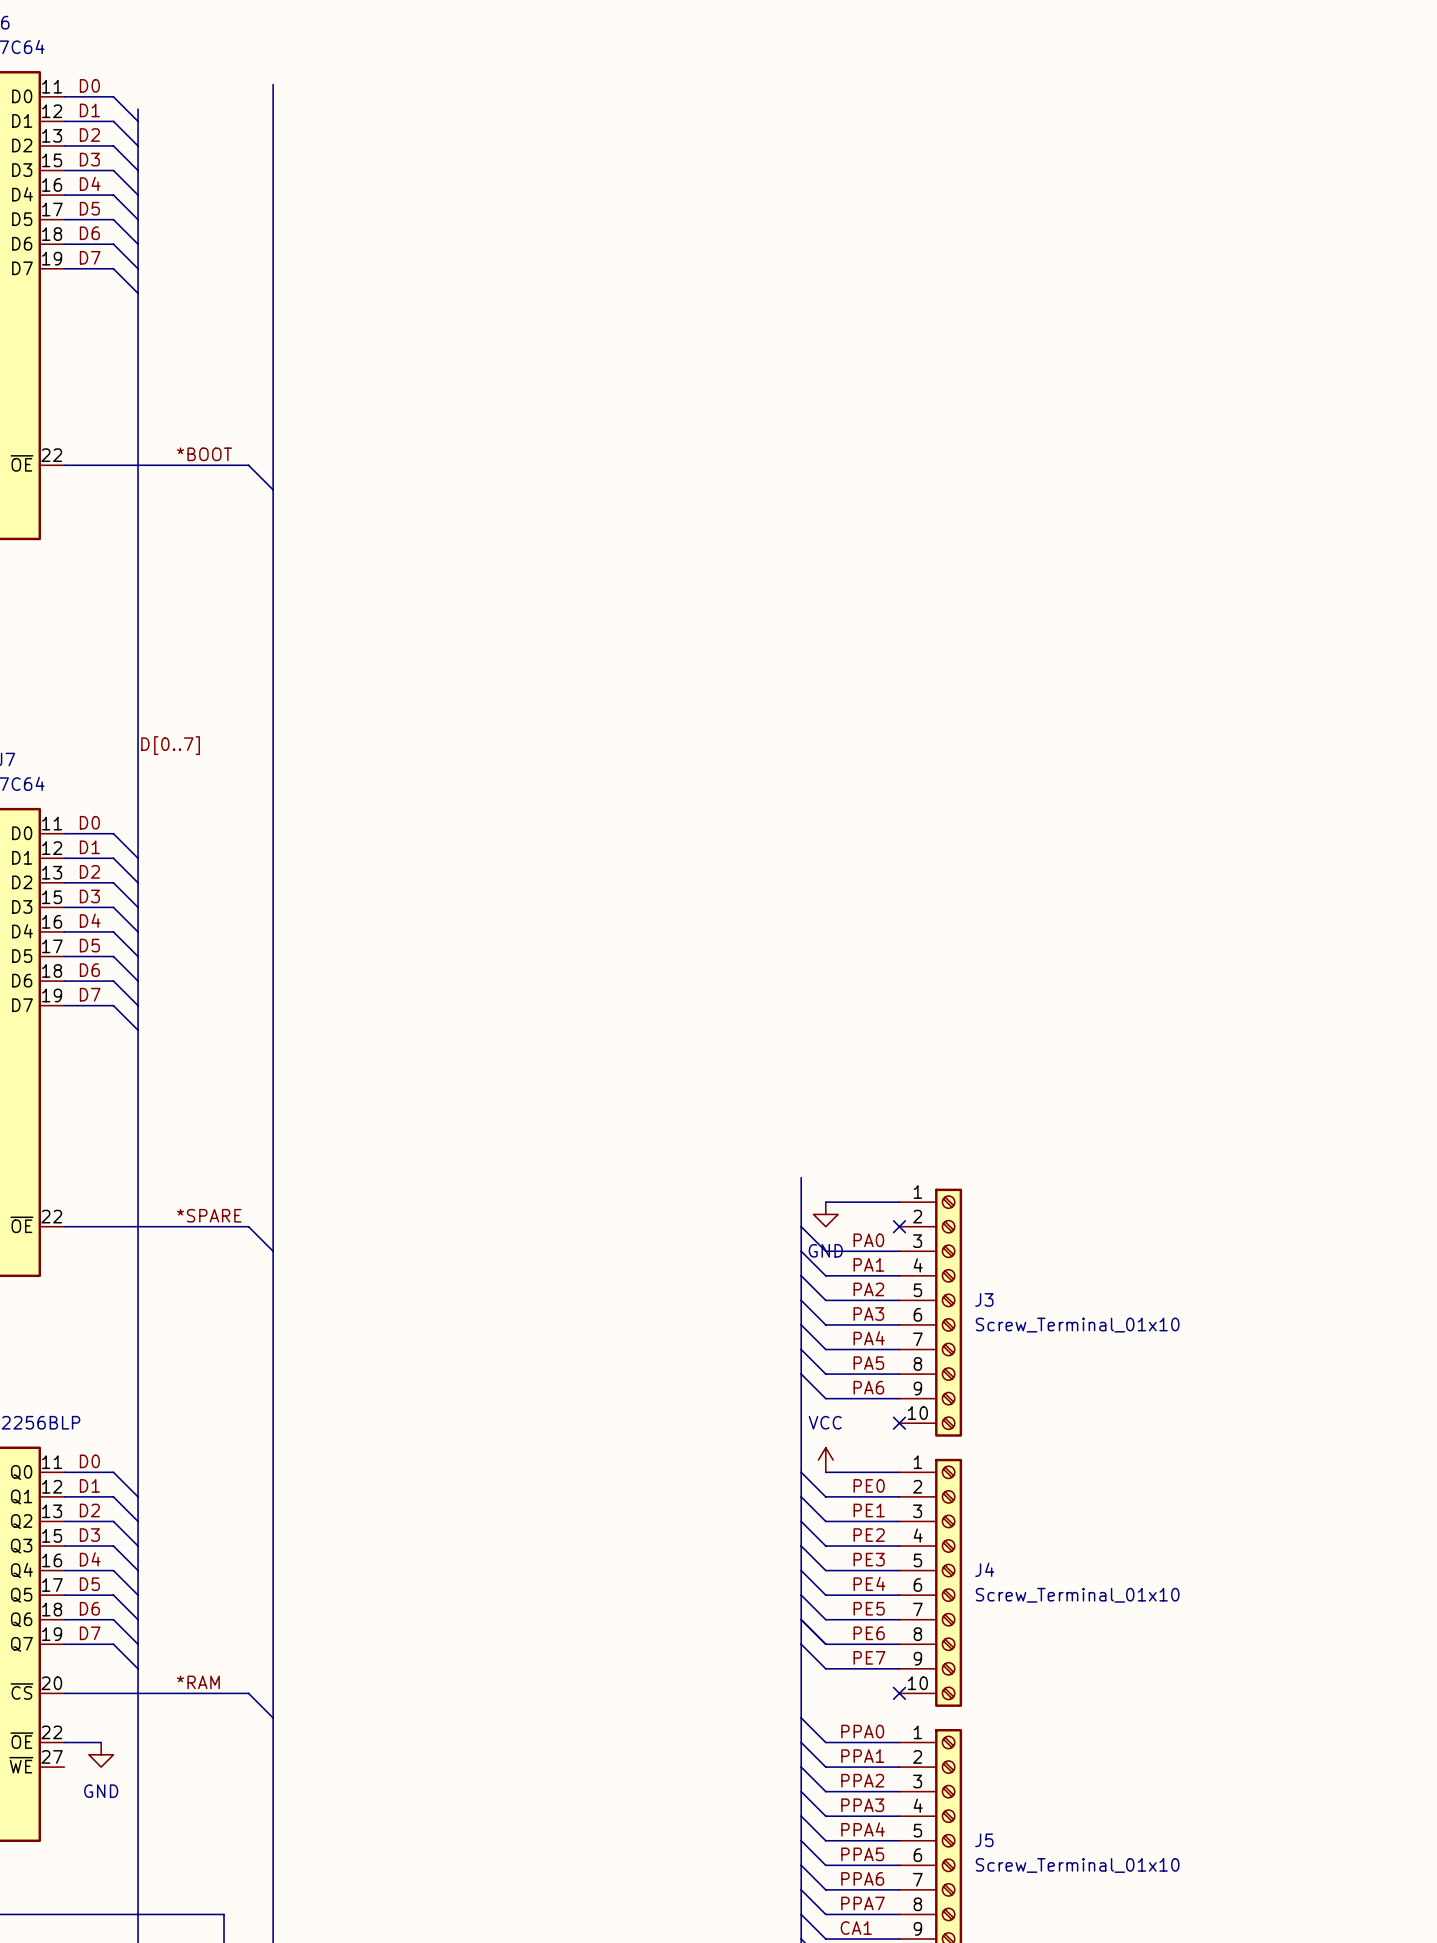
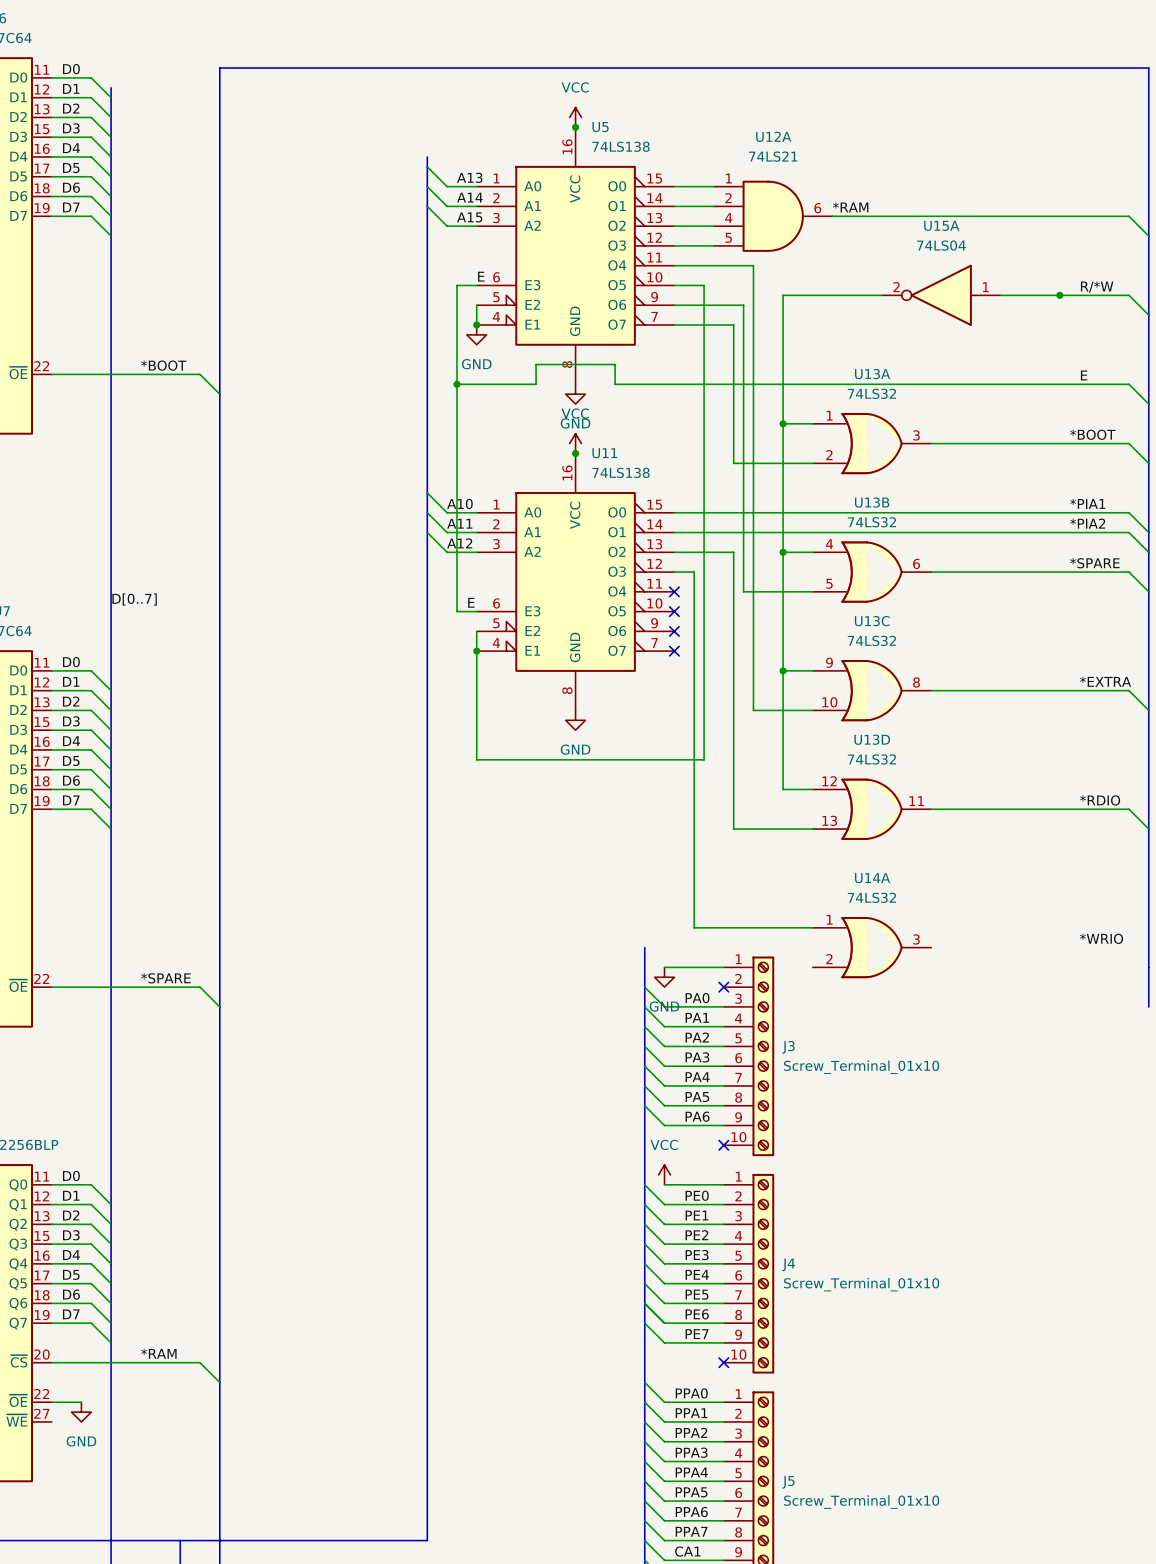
bus: none -> (219, 68) (1148, 68) (1148, 1006)
power symbol: none -> VCC (575, 117)
junction: none -> (575, 127)
bus: none -> (427, 156) (427, 1540) (180, 1540)
wire: none -> (427, 166) (447, 186) (476, 186)
label: none -> A13 (469, 177)
wire: none -> (427, 186) (447, 206) (476, 206)
wire: none -> (674, 186) (713, 186)
label: none -> A14 (469, 197)
wire: none -> (427, 206) (447, 226) (476, 226)
wire: none -> (674, 206) (713, 206)
label: none -> *RAM (850, 207)
U12A: none -> 74LS21 (773, 216)
wire: none -> (832, 216) (1129, 216) (1148, 236)
label: none -> A15 (469, 217)
wire: none -> (674, 226) (713, 226)
wire: none -> (674, 245) (713, 245)
U5: none -> 74LS138 (575, 255)
wire: none -> (674, 265) (753, 265) (753, 710) (812, 710)
label: none -> E (481, 276)
wire: none -> (476, 285) (456, 285) (456, 611) (476, 611)
wire: none -> (674, 285) (704, 285) (704, 759) (476, 759) (476, 631)
label: none -> R/*W (1097, 287)
wire: none -> (881, 295) (783, 295) (783, 789) (812, 789)
U15A: none -> 74LS04 (941, 295)
wire: none -> (1000, 295) (1129, 295) (1148, 315)
junction: none -> (1059, 295)
wire: none -> (476, 305) (476, 325)
wire: none -> (674, 305) (743, 305) (743, 591) (812, 591)
junction: none -> (476, 325)
wire: none -> (674, 325) (733, 325) (733, 463) (812, 463)
power symbol: none -> GND (476, 334)
label: none -> E (1084, 375)
wire: none -> (456, 384) (536, 384) (536, 364) (615, 364) (615, 384) (1129, 384) (1148, 404)
junction: none -> (456, 384)
power symbol: none -> GND (575, 394)
wire: none -> (783, 423) (812, 423)
junction: none -> (783, 423)
label: none -> *BOOT (1092, 434)
power symbol: none -> VCC (575, 443)
U13A: none -> 74LS32 (872, 443)
wire: none -> (931, 443) (1129, 443) (1148, 463)
junction: none -> (575, 453)
wire: none -> (427, 493) (447, 512) (476, 512)
label: none -> A10 (459, 503)
label: none -> *PIA1 (1087, 503)
wire: none -> (427, 512) (447, 532) (476, 532)
wire: none -> (674, 512) (1129, 512) (1148, 532)
label: none -> A11 (459, 523)
label: none -> *PIA2 (1087, 523)
wire: none -> (427, 532) (447, 552) (476, 552)
wire: none -> (674, 532) (1129, 532) (1148, 552)
label: none -> A12 (459, 543)
wire: none -> (674, 552) (733, 552) (733, 829) (812, 829)
wire: none -> (783, 552) (812, 552)
junction: none -> (783, 552)
label: none -> *SPARE (1094, 563)
wire: none -> (674, 572) (694, 572) (694, 927) (812, 927)
U13B: none -> 74LS32 (872, 572)
wire: none -> (931, 572) (1129, 572) (1148, 591)
U11: none -> 74LS138 (575, 581)
no-connect mark: none -> (674, 591)
label: none -> E (471, 602)
no-connect mark: none -> (674, 611)
no-connect mark: none -> (674, 631)
junction: none -> (476, 651)
no-connect mark: none -> (674, 651)
wire: none -> (783, 670) (812, 670)
junction: none -> (783, 670)
label: none -> *EXTRA (1105, 681)
U13C: none -> 74LS32 (872, 690)
wire: none -> (931, 690) (1129, 690) (1148, 710)
power symbol: none -> GND (575, 720)
label: none -> *RDIO (1100, 800)
U13D: none -> 74LS32 (872, 809)
wire: none -> (931, 809) (1129, 809) (1148, 829)
label: none -> *WRIO (1101, 938)
U14A: none -> 74LS32 (872, 947)

